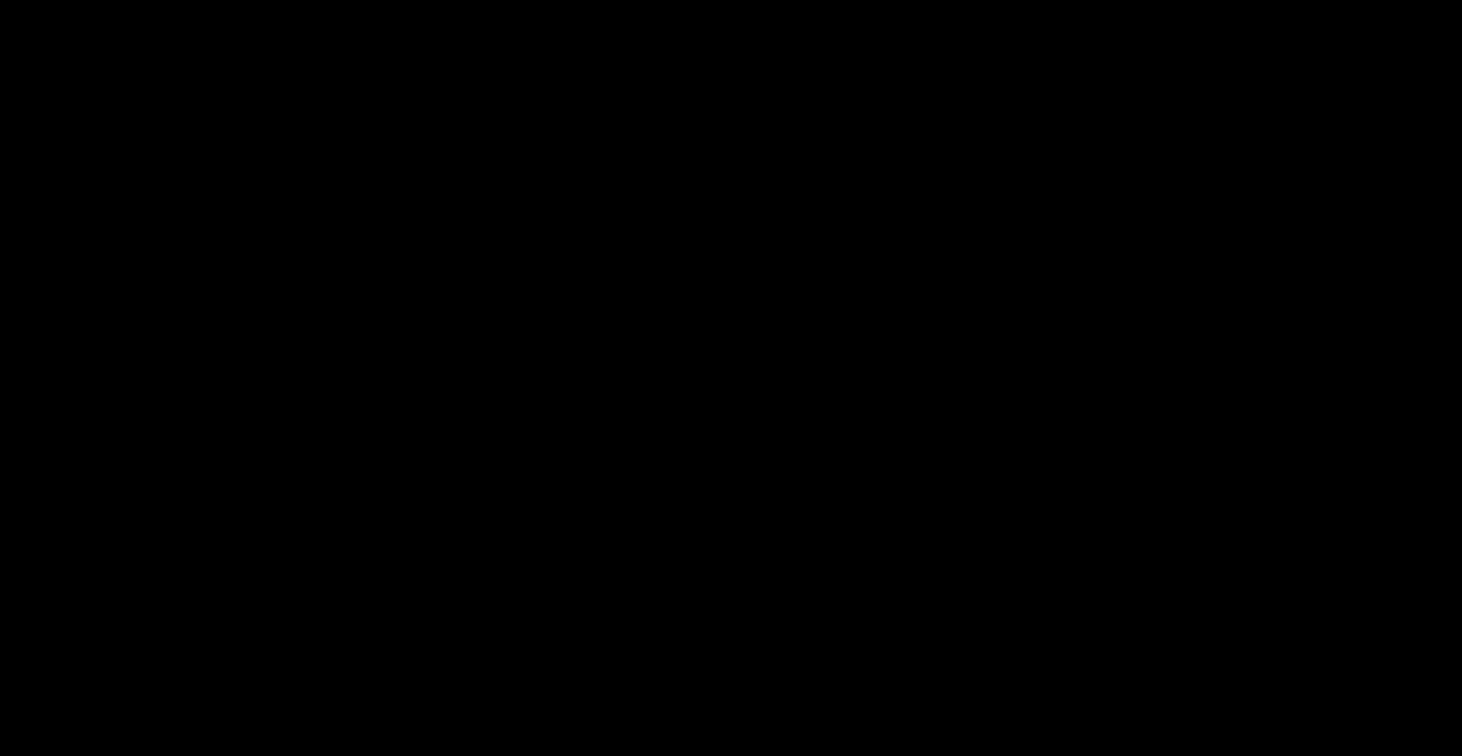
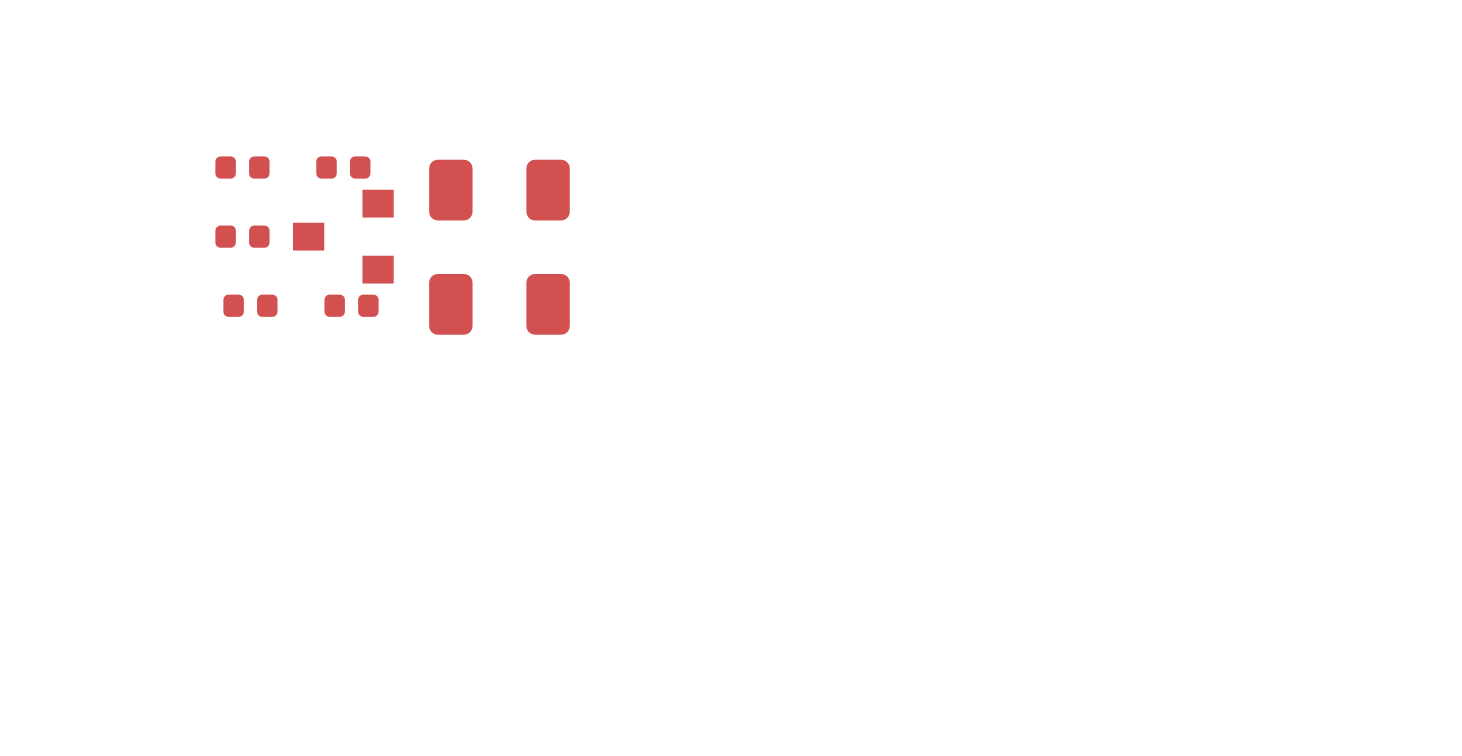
part: none -> (242, 167)
part: none -> (343, 167)
part: none -> (499, 190)
part: none -> (242, 236)
part: none -> (343, 236)
part: none -> (499, 304)
part: none -> (250, 305)
part: none -> (351, 305)

